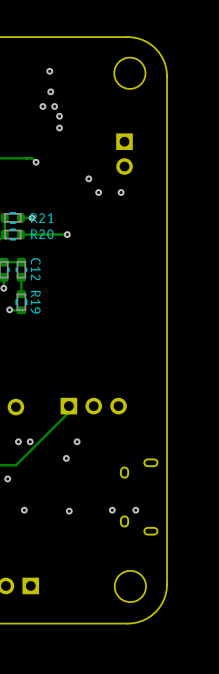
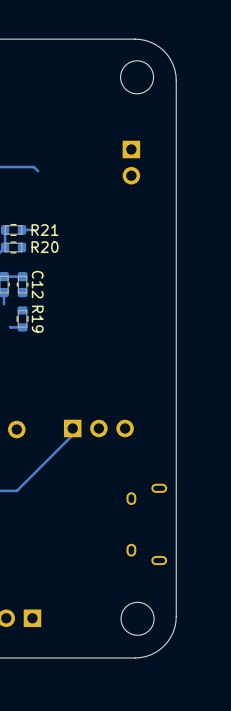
via: (49, 71) -> none
via: (50, 91) -> none
via: (42, 106) -> none
via: (54, 106) -> none
via: (59, 116) -> none
via: (59, 128) -> none
via: (36, 162) -> none
via: (88, 178) -> none
via: (98, 192) -> none
via: (121, 192) -> none
via: (32, 217) -> none
track: (67, 234) (20, 234) -> none
via: (67, 234) -> none
track: (21, 277) (21, 294) -> none
via: (3, 288) -> none
via: (9, 309) -> none
via: (18, 441) -> none
via: (30, 441) -> none
via: (77, 441) -> none
via: (66, 458) -> none
via: (7, 478) -> none
via: (24, 510) -> none
via: (112, 510) -> none
via: (135, 510) -> none
via: (69, 511) -> none

